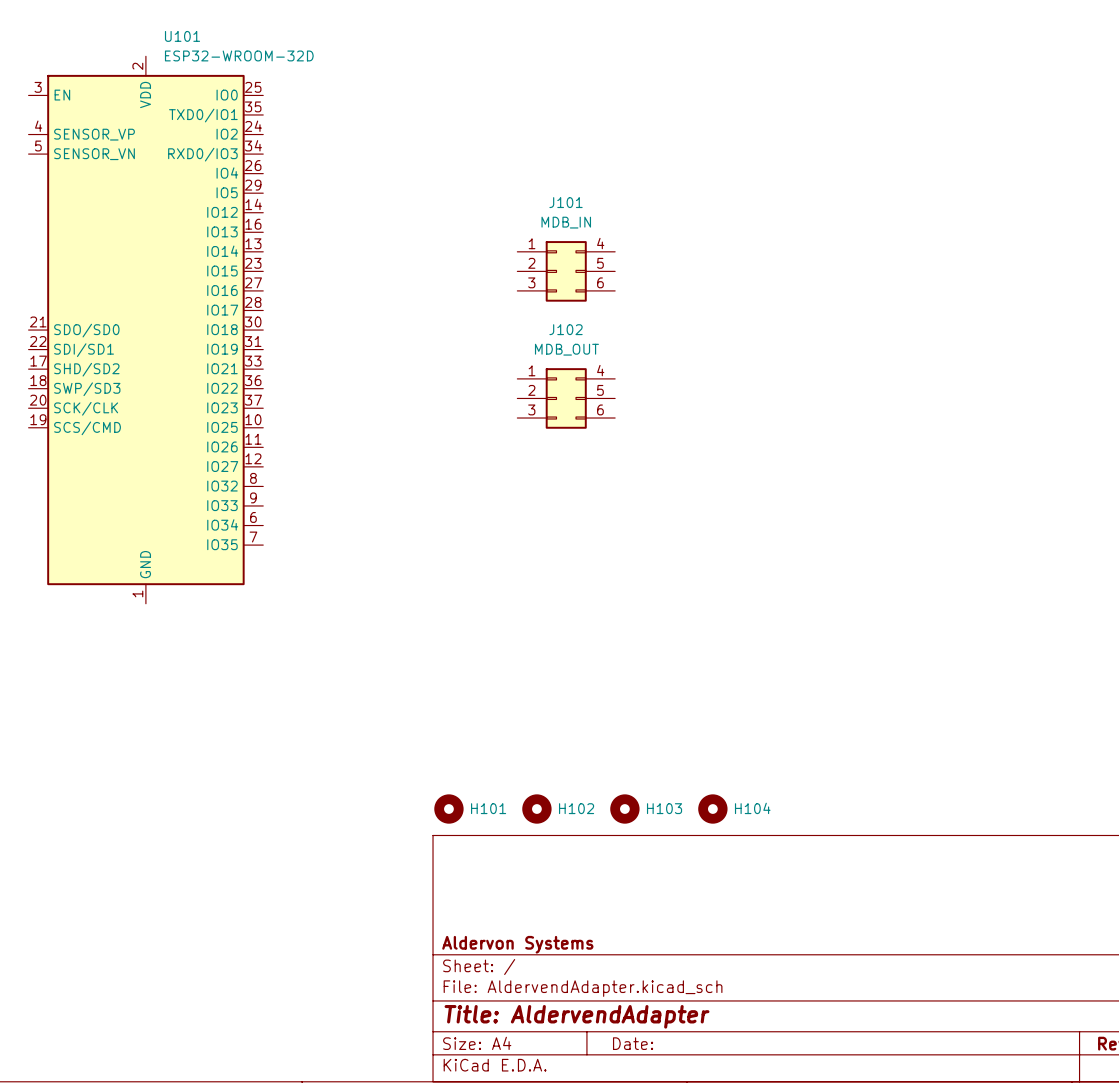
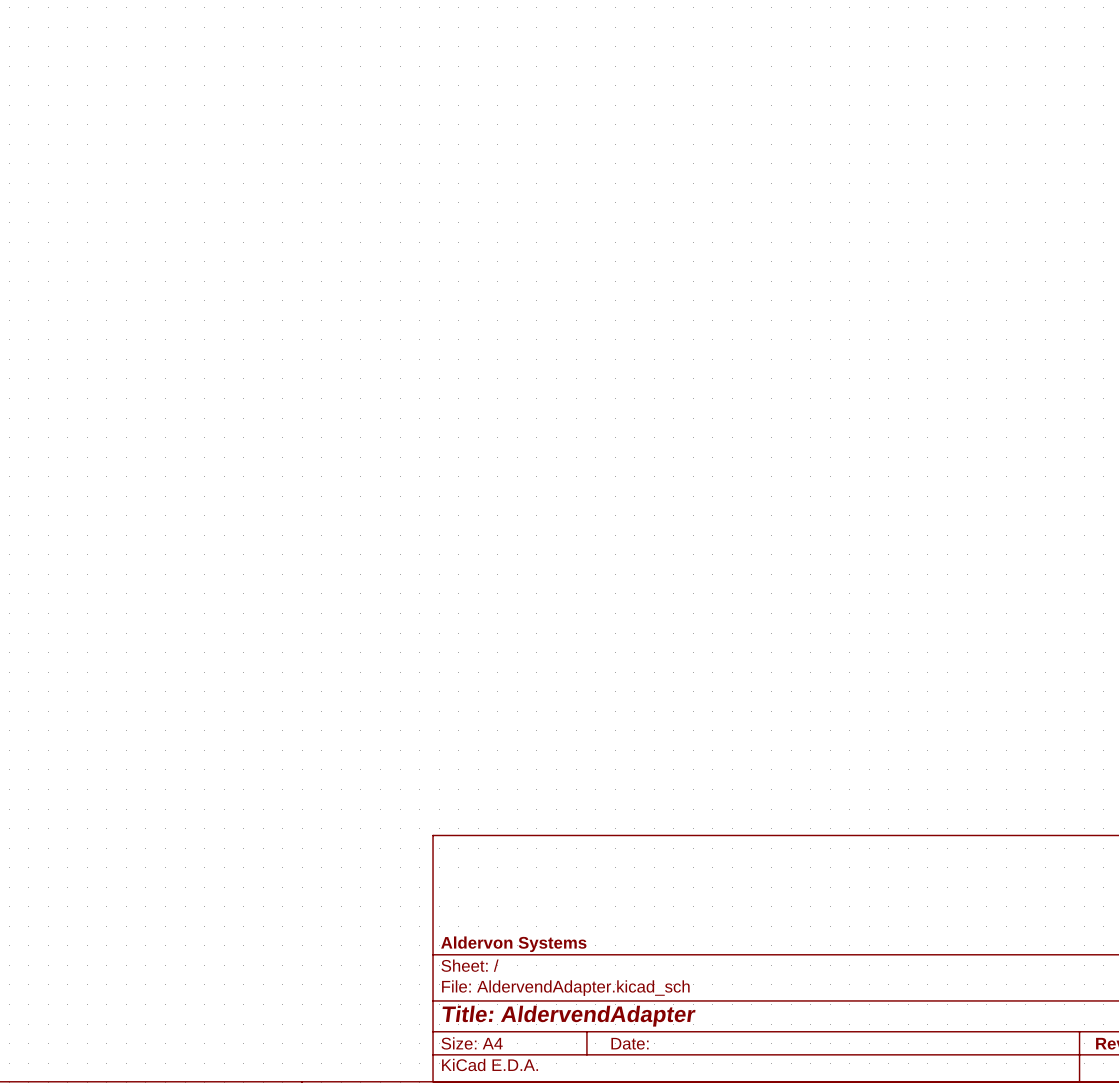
J101: MDB_IN (566, 271) -> none
U101: ESP32-WROOM-32D (145, 330) -> none
J102: MDB_OUT (566, 398) -> none
H101: (448, 809) -> none
H102: (536, 809) -> none
H103: (624, 809) -> none
H104: (712, 809) -> none

